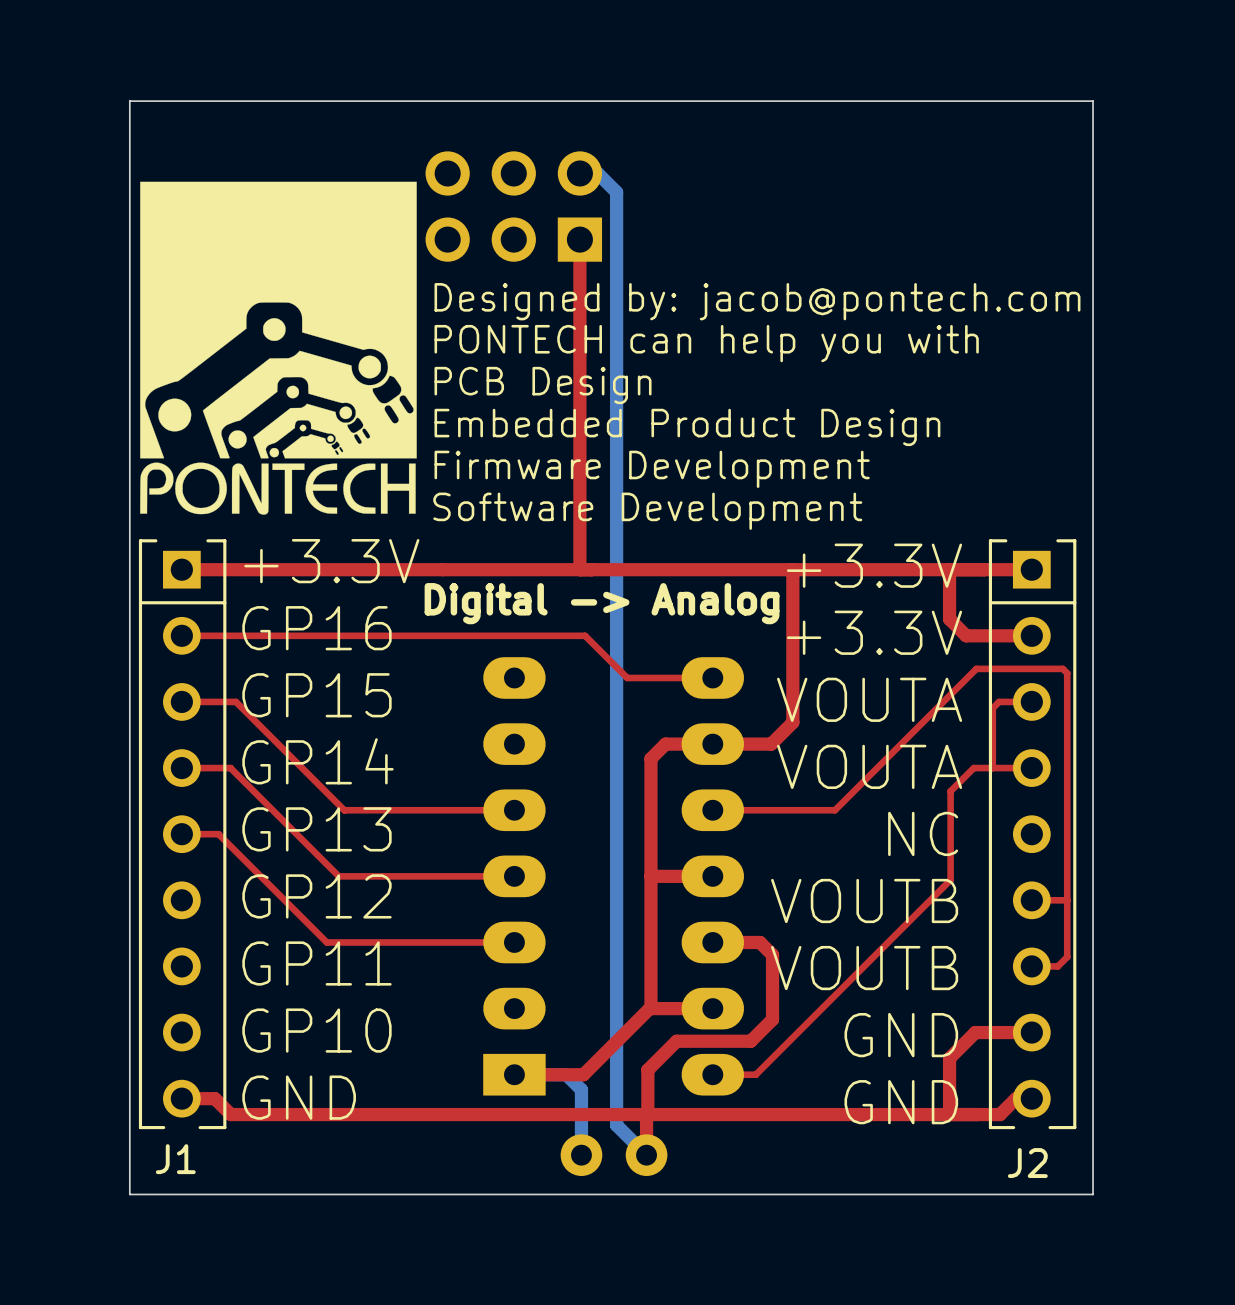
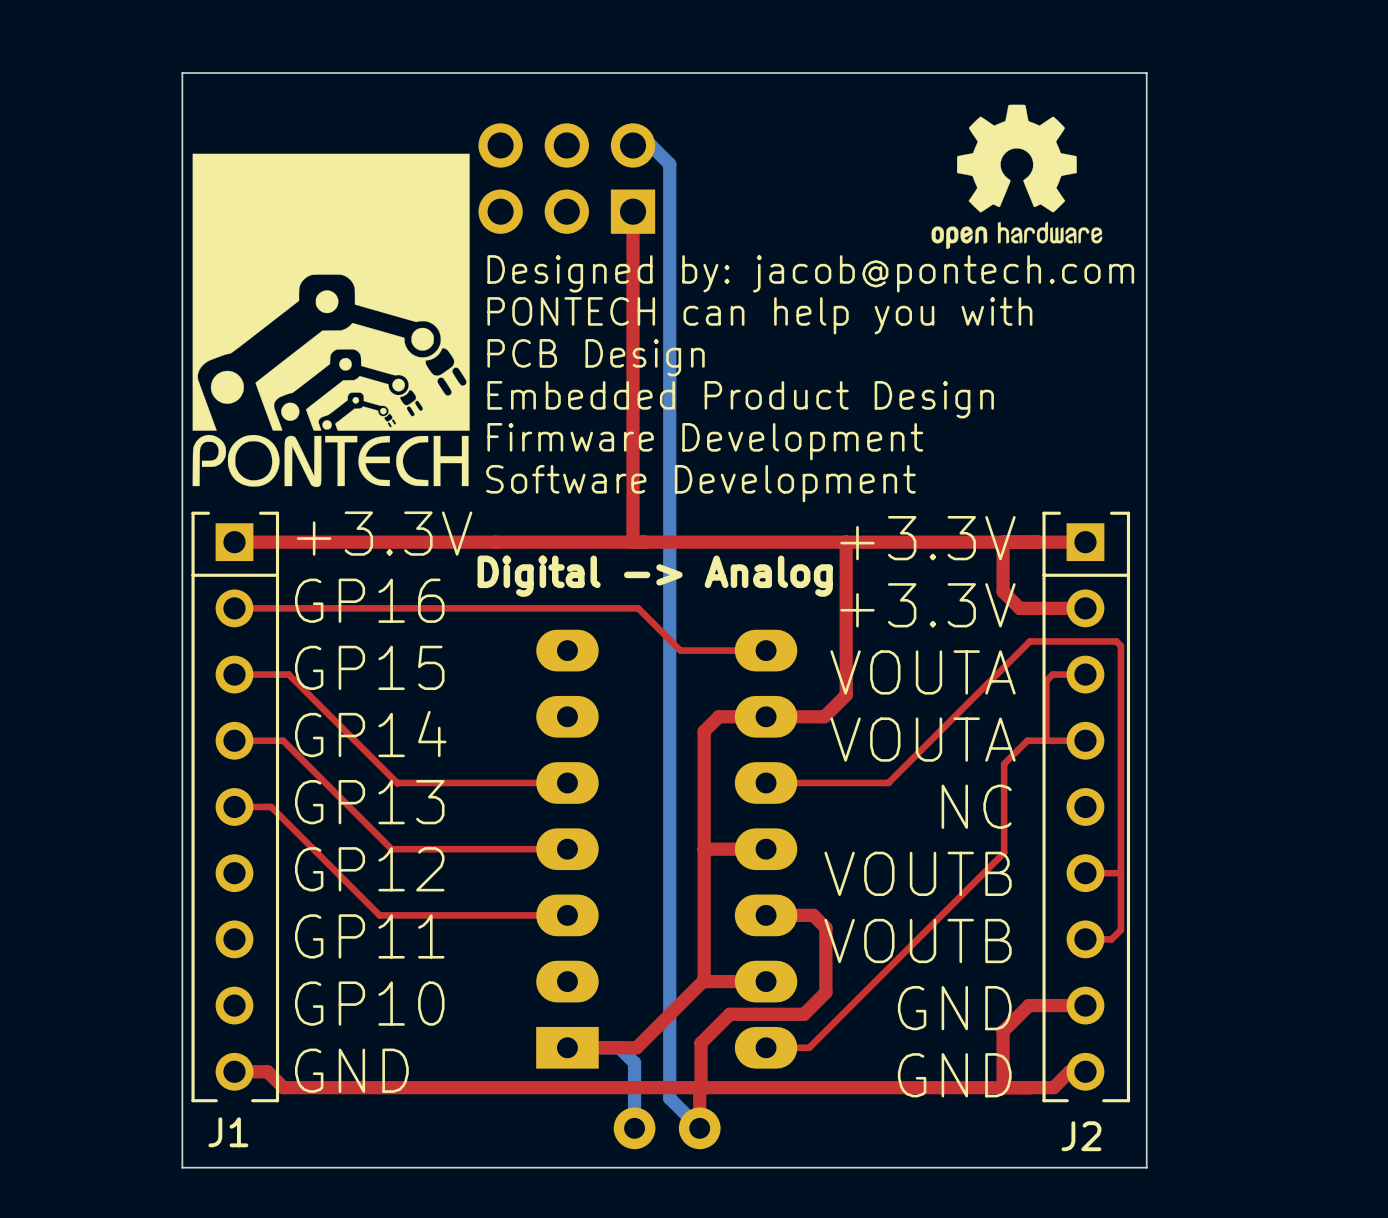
drawing: none -> [931, 104, 1103, 250]

